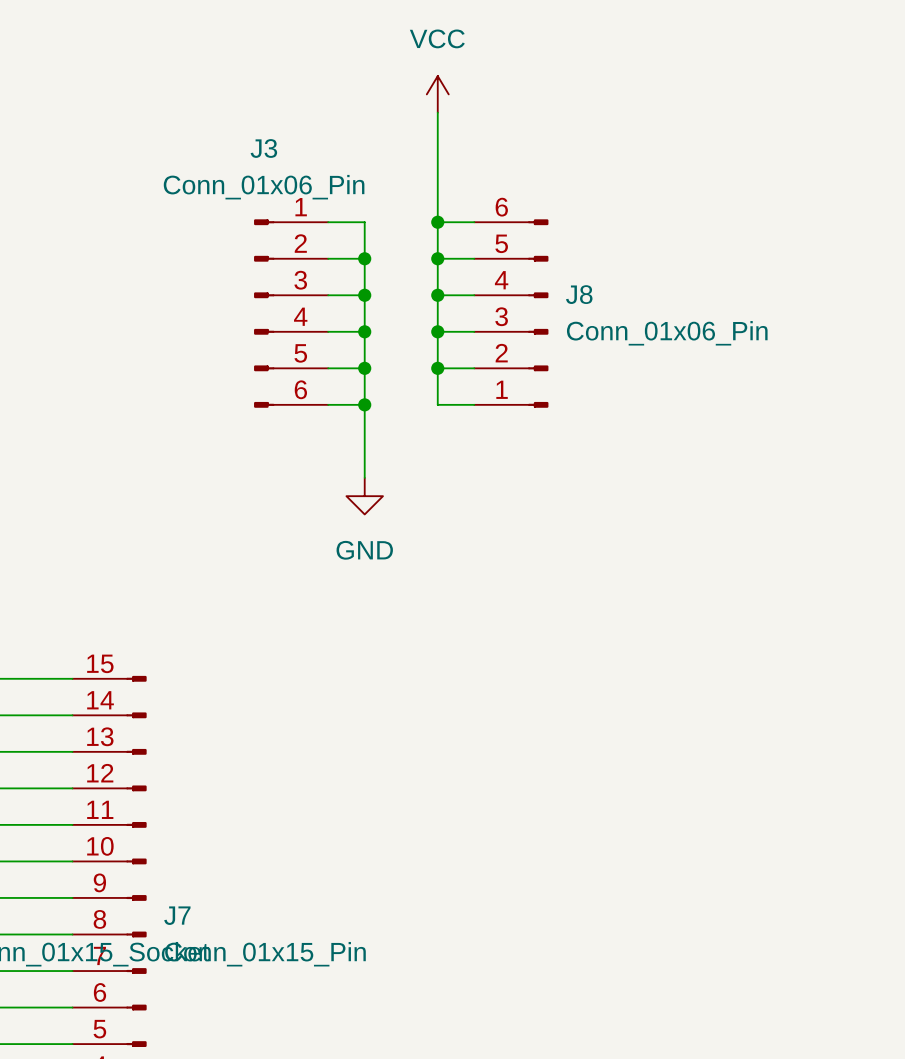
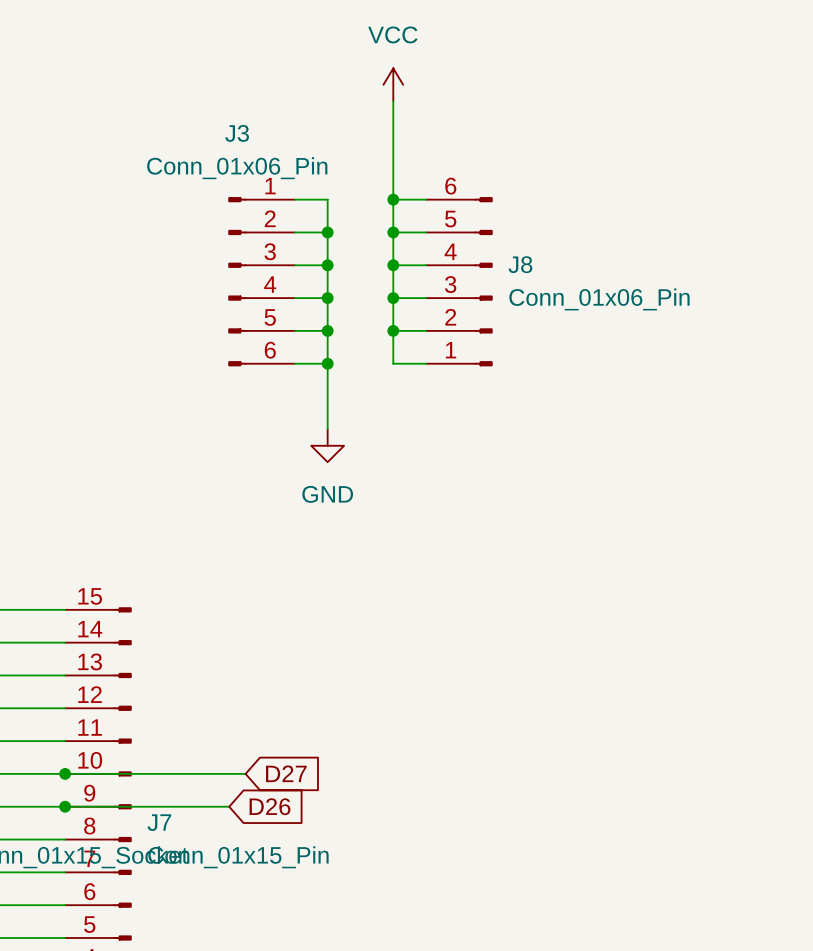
wire: none -> (65, 773) (245, 773)
junction: none -> (65, 773)
global label: none -> D27 (286, 773)
wire: none -> (65, 806) (229, 806)
junction: none -> (65, 806)
global label: none -> D26 (270, 806)

